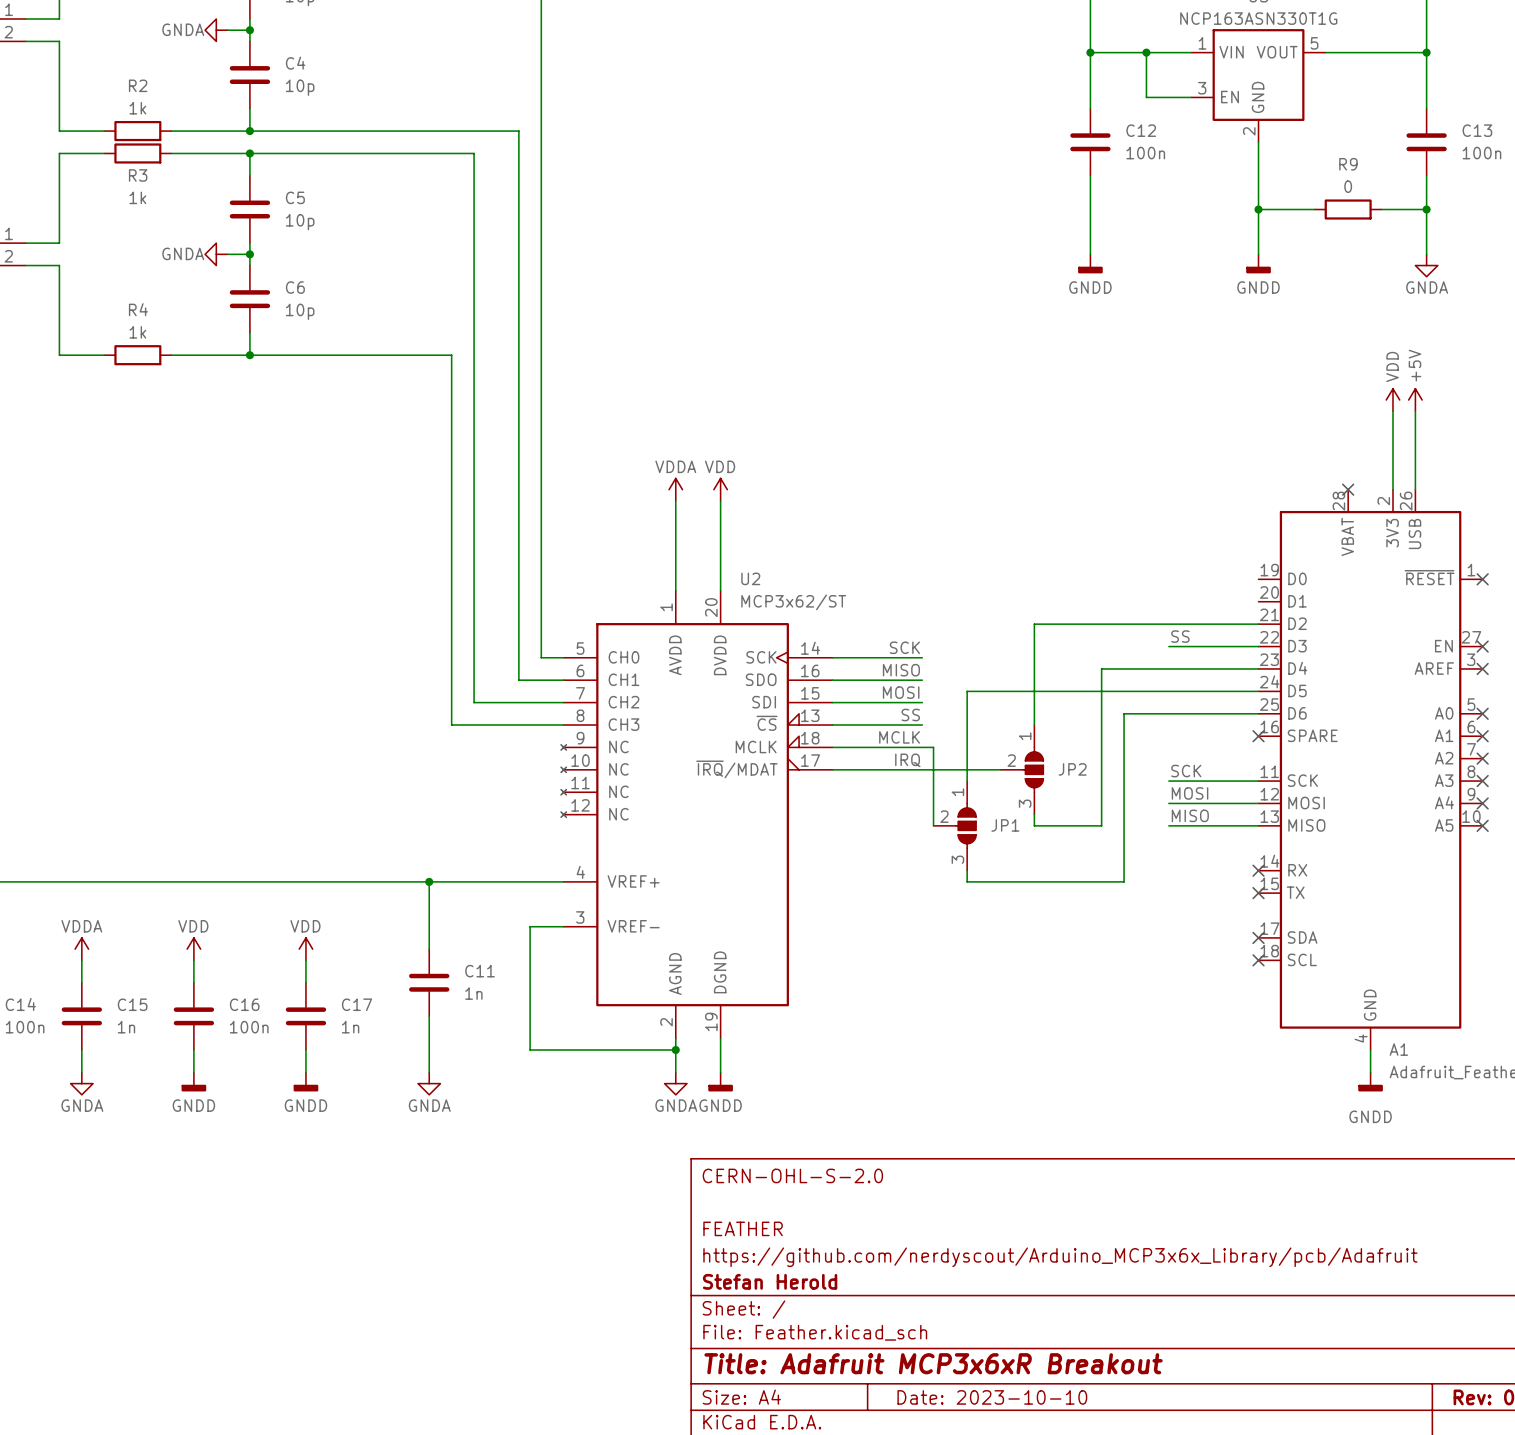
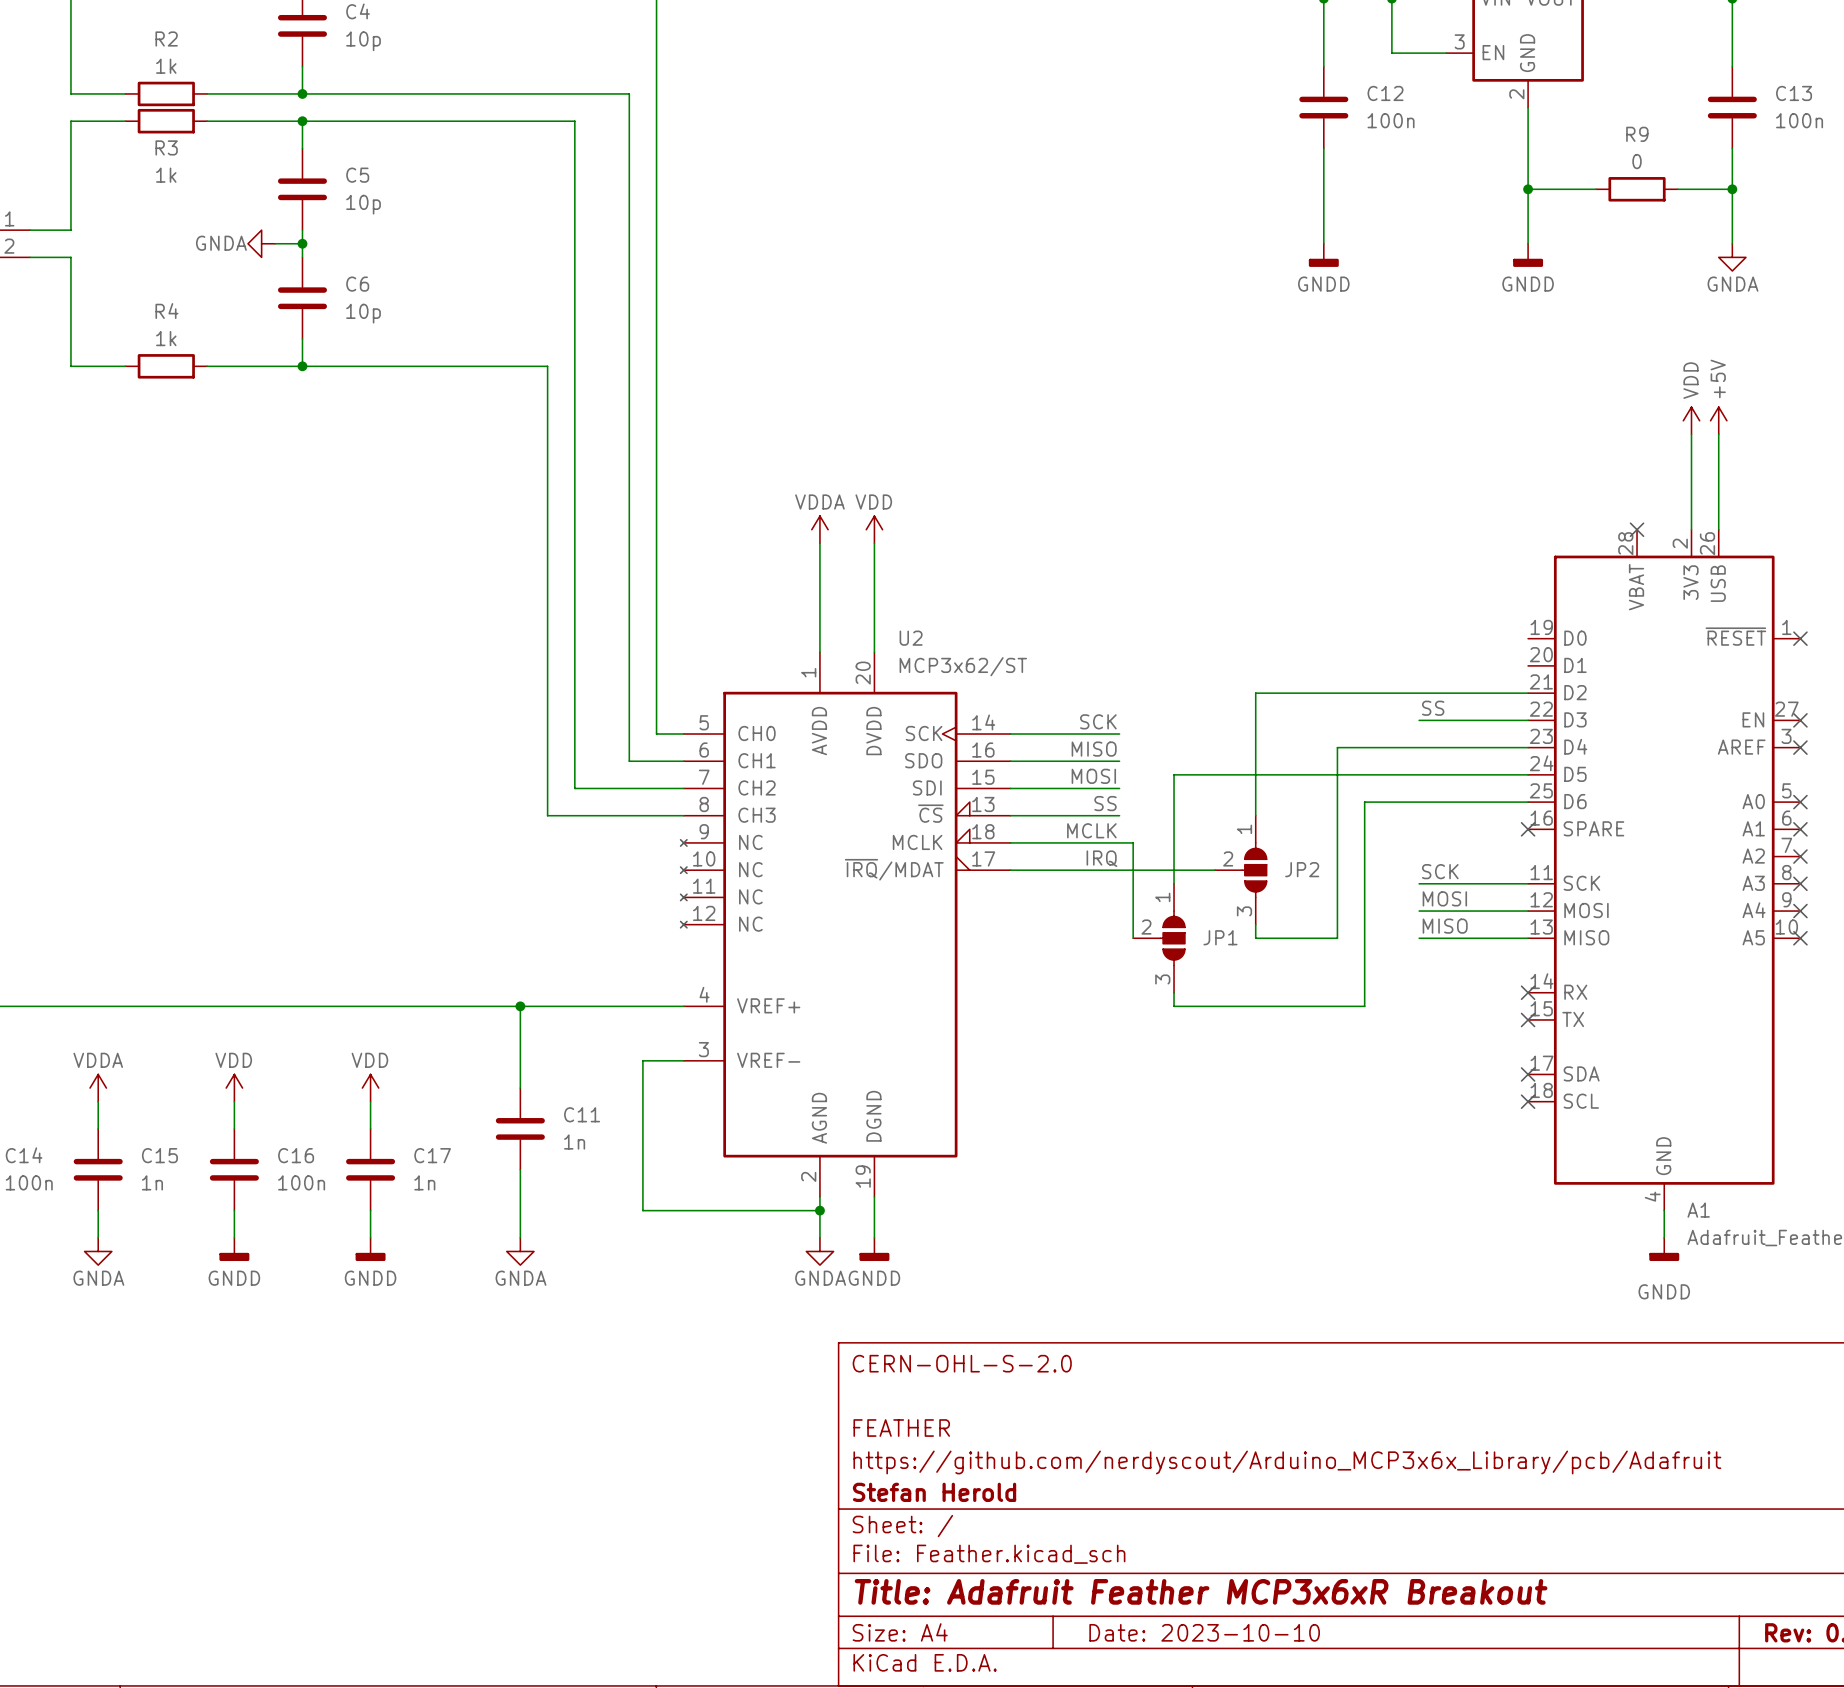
title block: Title: Adafruit MCP3x6xR Breakout (933, 1363) -> Title: Adafruit Feather MCP3x6xR Breakout (1201, 1591)

